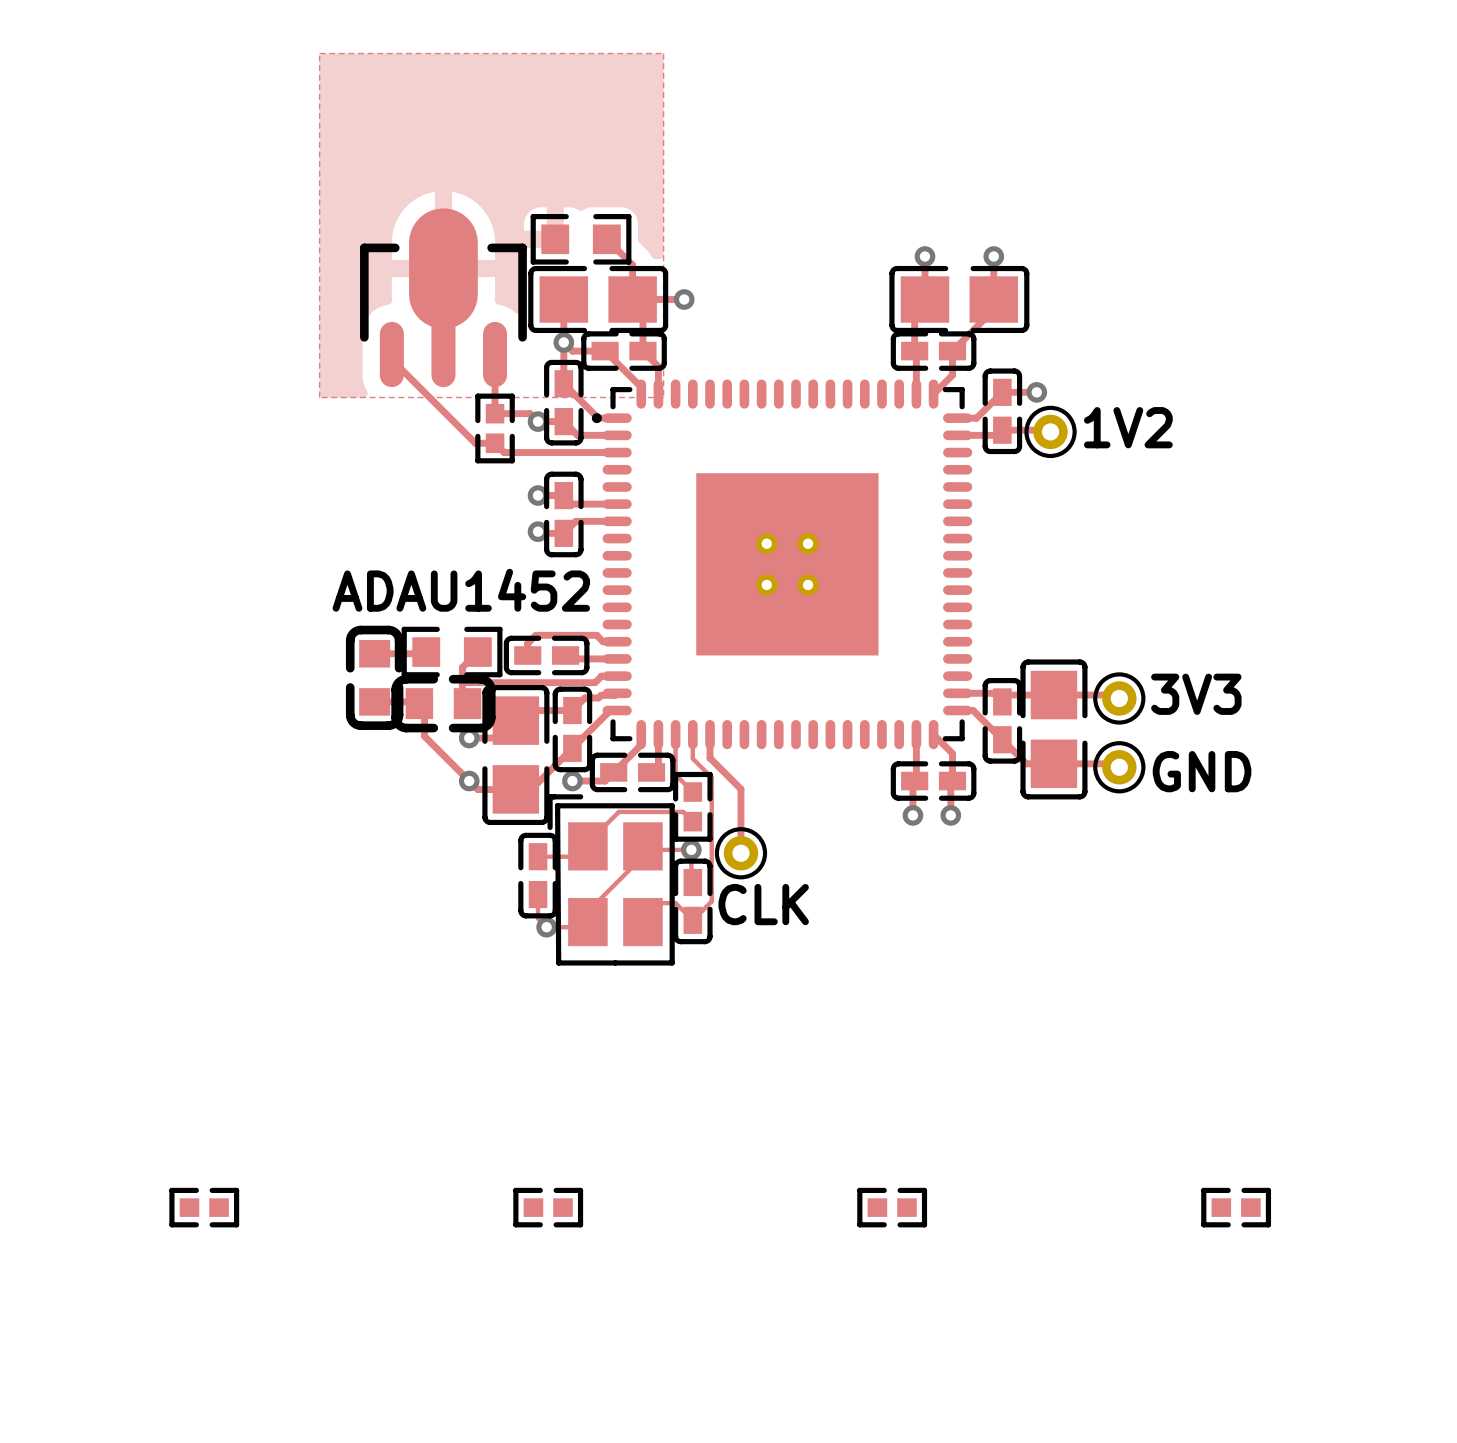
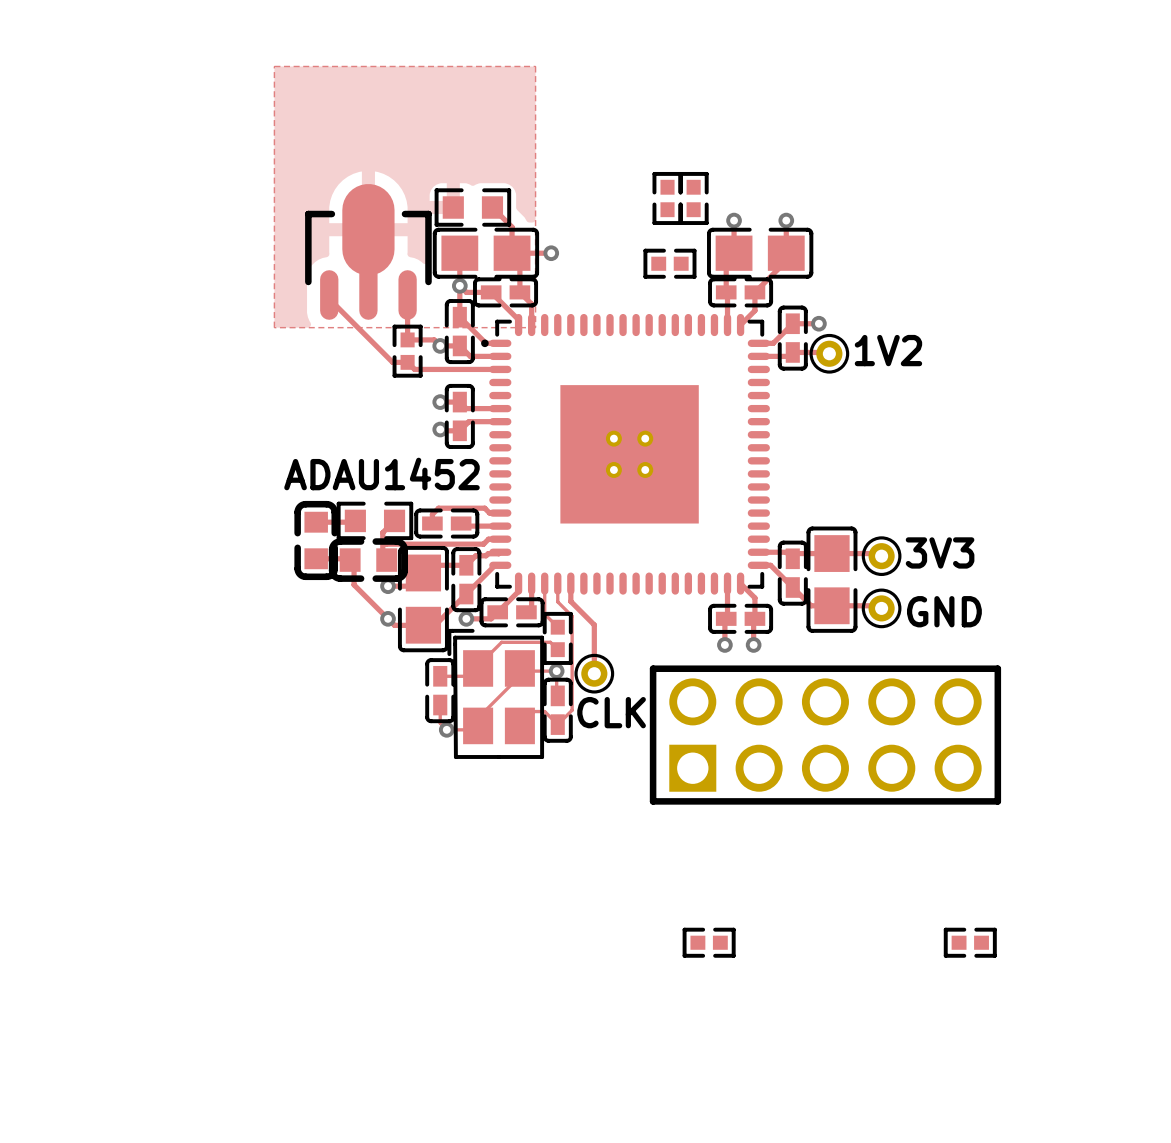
part: none -> (667, 198)
part: none -> (693, 198)
part: none -> (669, 263)
part: none -> (825, 735)
part: (204, 1207) -> none
part: (548, 1207) -> none

